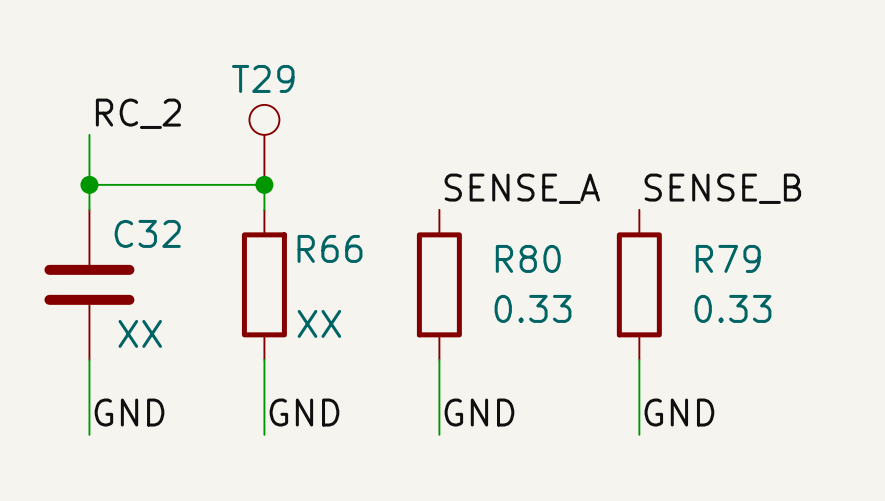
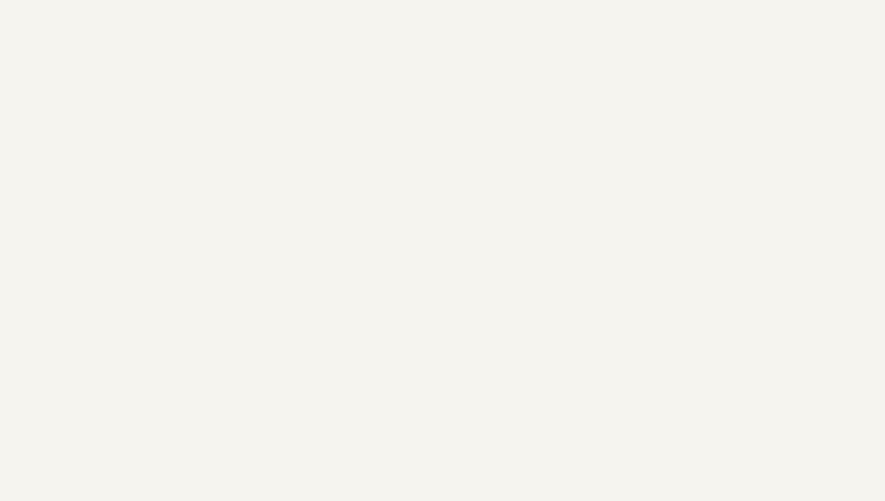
label: RC_2 (138, 113) -> none
wire: (89, 134) (89, 209) -> none
T29: (264, 144) -> none
wire: (89, 184) (264, 184) (264, 209) -> none
junction: (89, 184) -> none
junction: (264, 184) -> none
label: SENSE_A (522, 188) -> none
label: SENSE_B (722, 188) -> none
C32: XX (89, 284) -> none
R66: XX (264, 284) -> none
R80: 0.33 (439, 284) -> none
R79: 0.33 (639, 284) -> none
wire: (89, 359) (89, 434) -> none
wire: (264, 359) (264, 434) -> none
wire: (439, 359) (439, 434) -> none
wire: (639, 359) (639, 434) -> none
label: GND (129, 412) -> none
label: GND (304, 412) -> none
label: GND (479, 412) -> none
label: GND (679, 412) -> none

